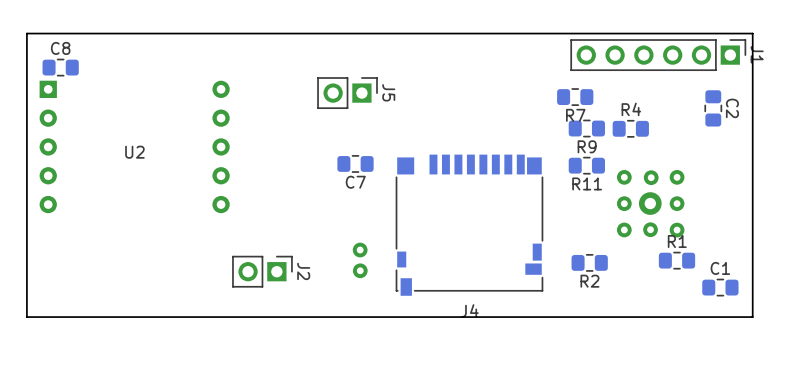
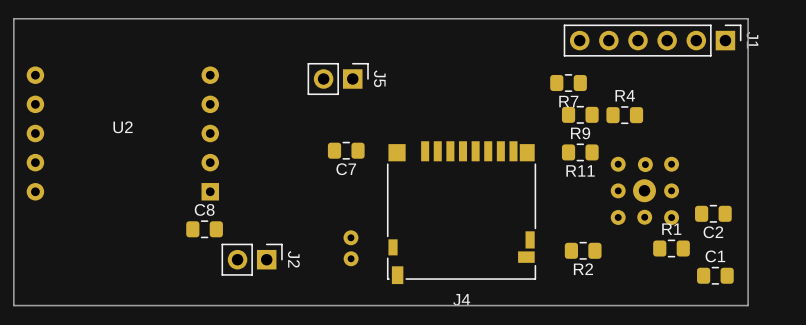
C8 position: (60, 67) -> (204, 229)
C2 rotation: 0° (713, 108) -> 90° clockwise (713, 213)
C2 position: (713, 108) -> (713, 213)
U2 rotation: 0° (134, 146) -> 180° (122, 133)

